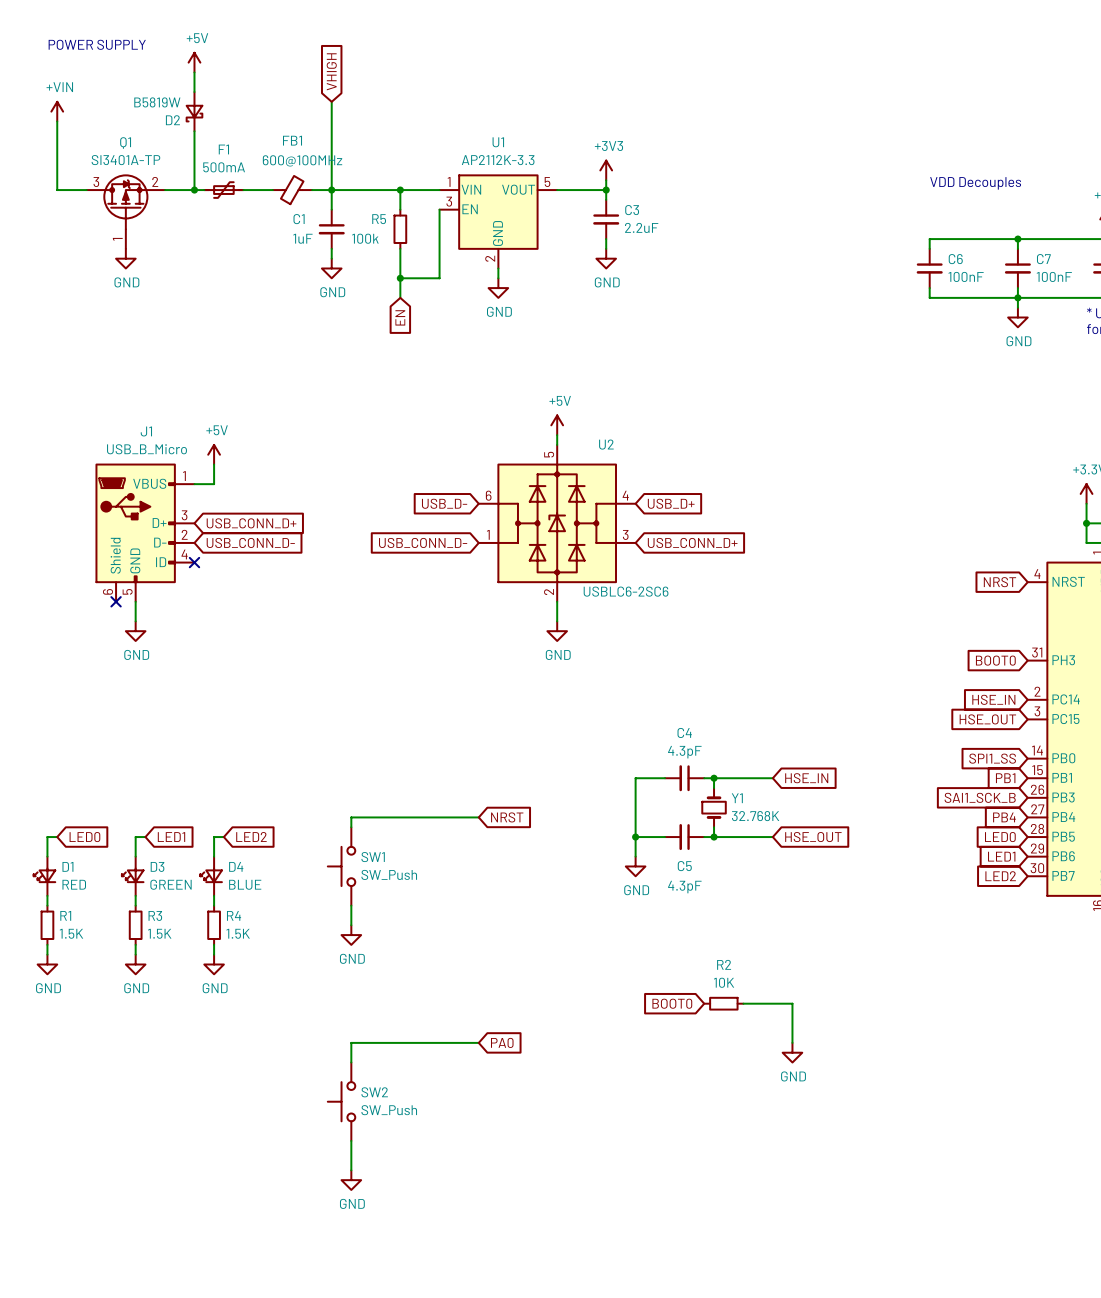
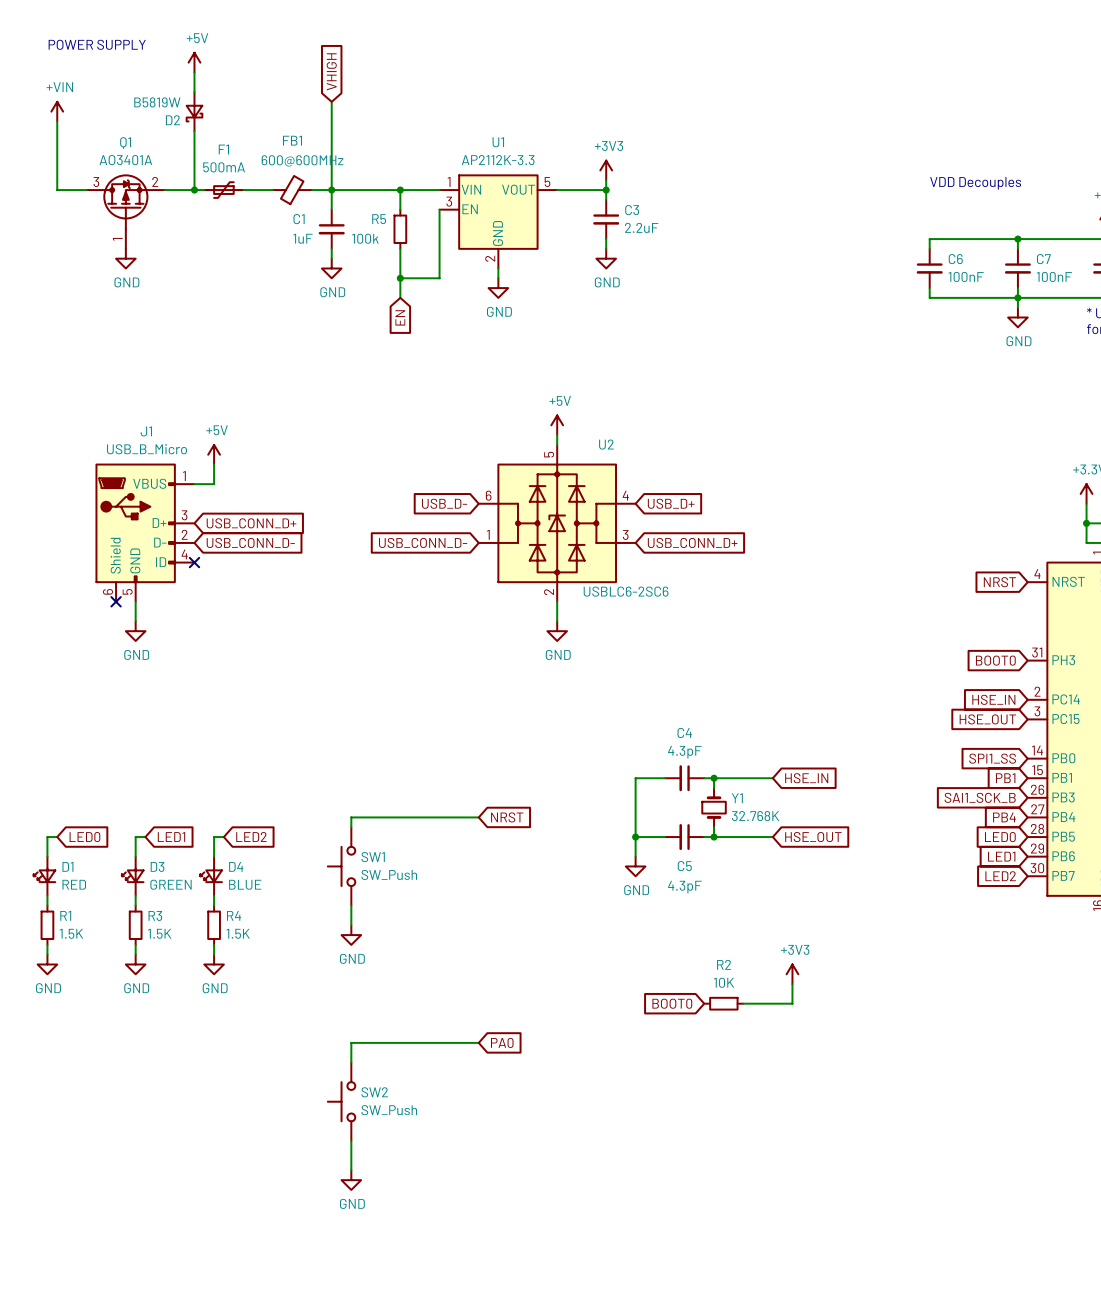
Q1 value: SI3401A-TP (125, 160) -> AO3401A (125, 160)
FB1 value: 600@100MHz (302, 160) -> 600@600MHz (302, 160)
power symbol: none -> +3V3 (792, 974)
wire: (792, 1003) (792, 1042) -> (792, 1003) (792, 984)
power symbol: GND (792, 1052) -> none

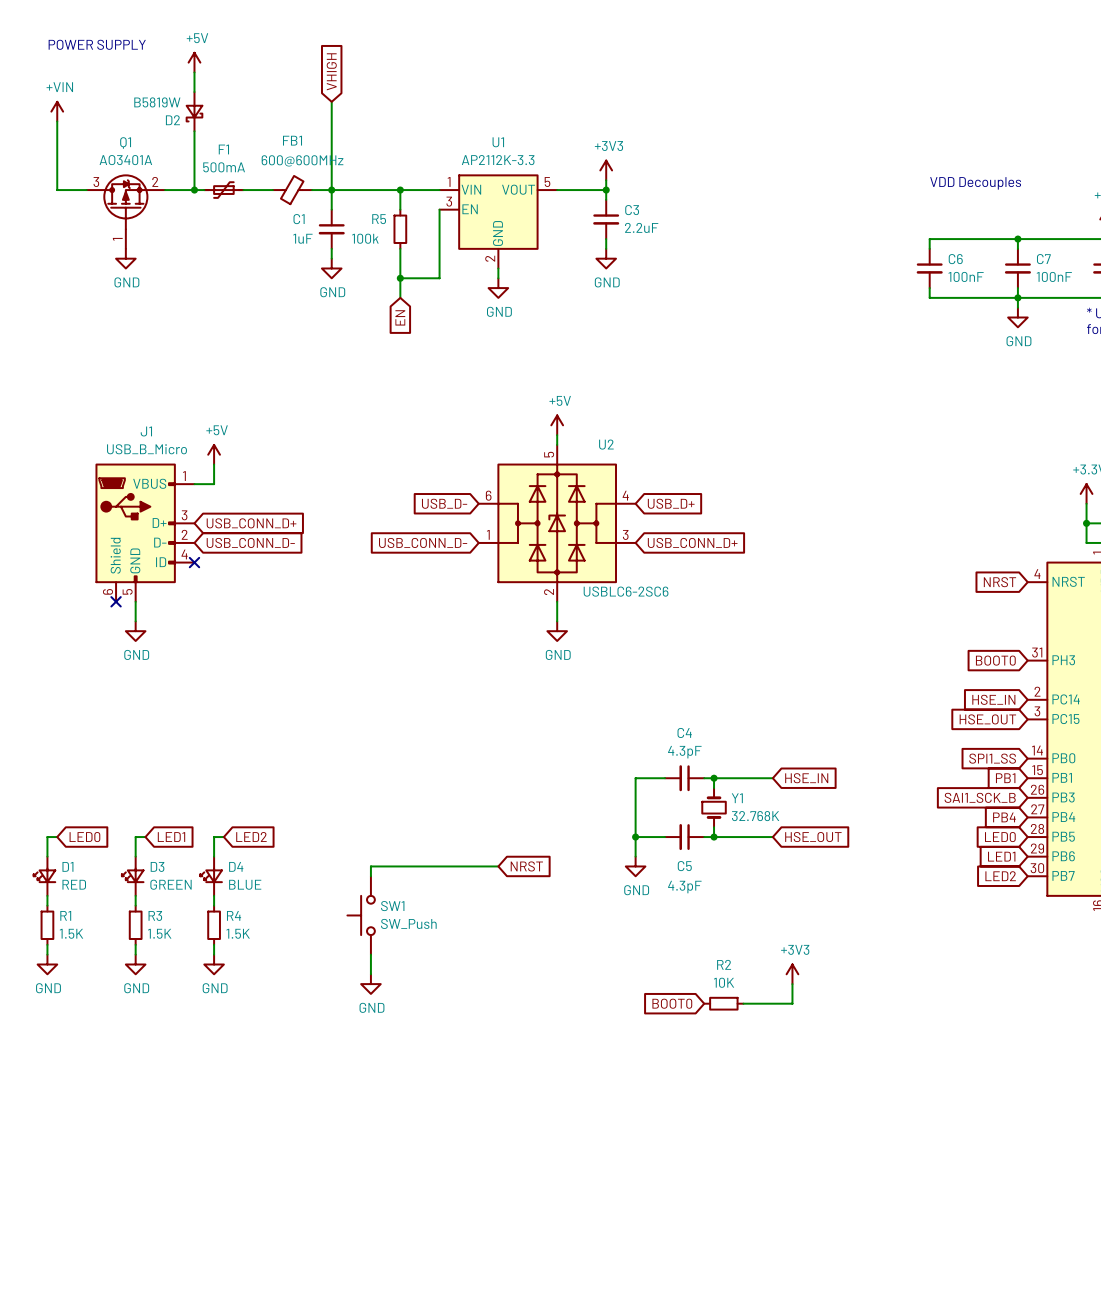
wire: (478, 817) (351, 817) (351, 827) -> (498, 866) (370, 866) (370, 876)
global label position: NRST (507, 817) -> NRST (526, 866)
SW1 position: (341, 866) -> (361, 915)
wire: (351, 905) (351, 925) -> (370, 954) (370, 974)
power symbol position: GND (351, 935) -> GND (370, 984)
wire: (478, 1042) (351, 1042) (351, 1062) -> none
global label: PA0 (502, 1042) -> none
SW2: SW_Push (341, 1101) -> none
wire: (351, 1140) (351, 1170) -> none
power symbol: GND (351, 1180) -> none

